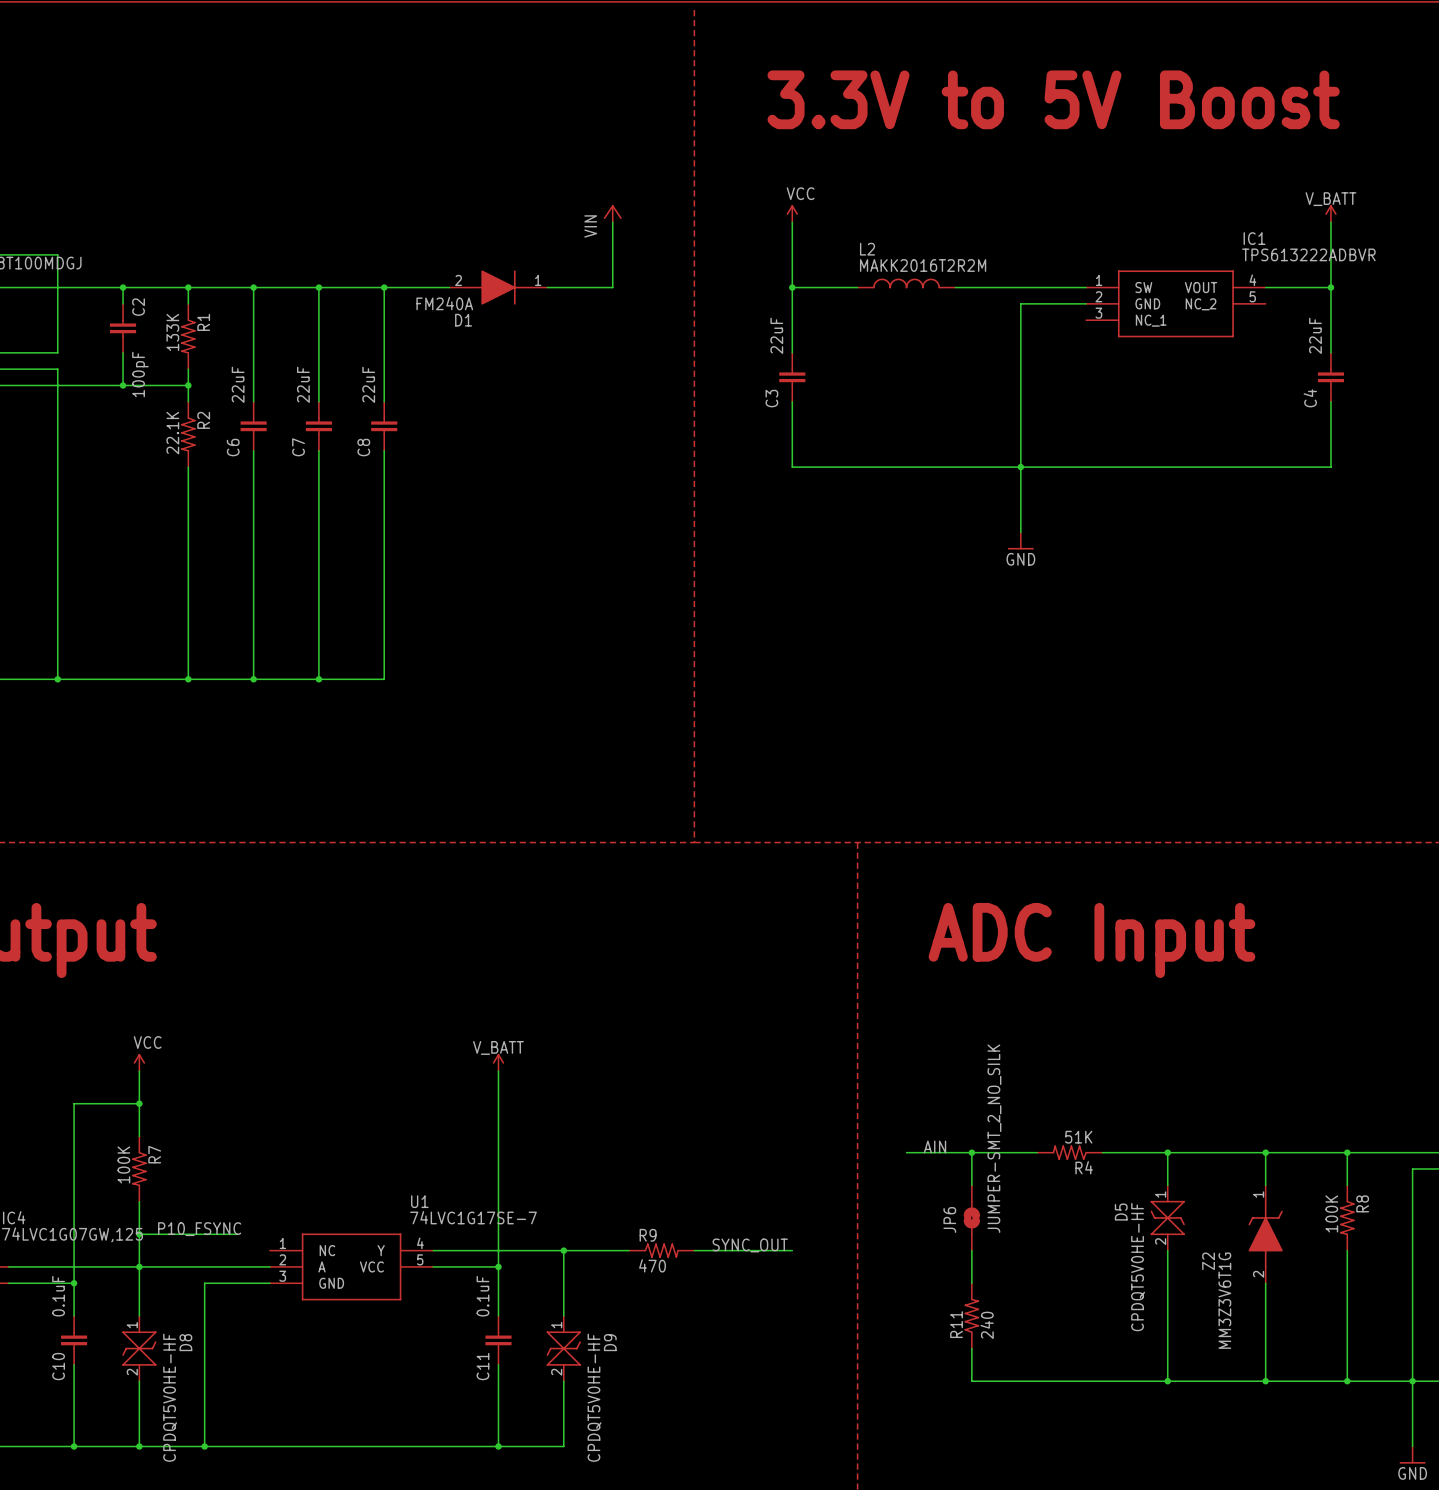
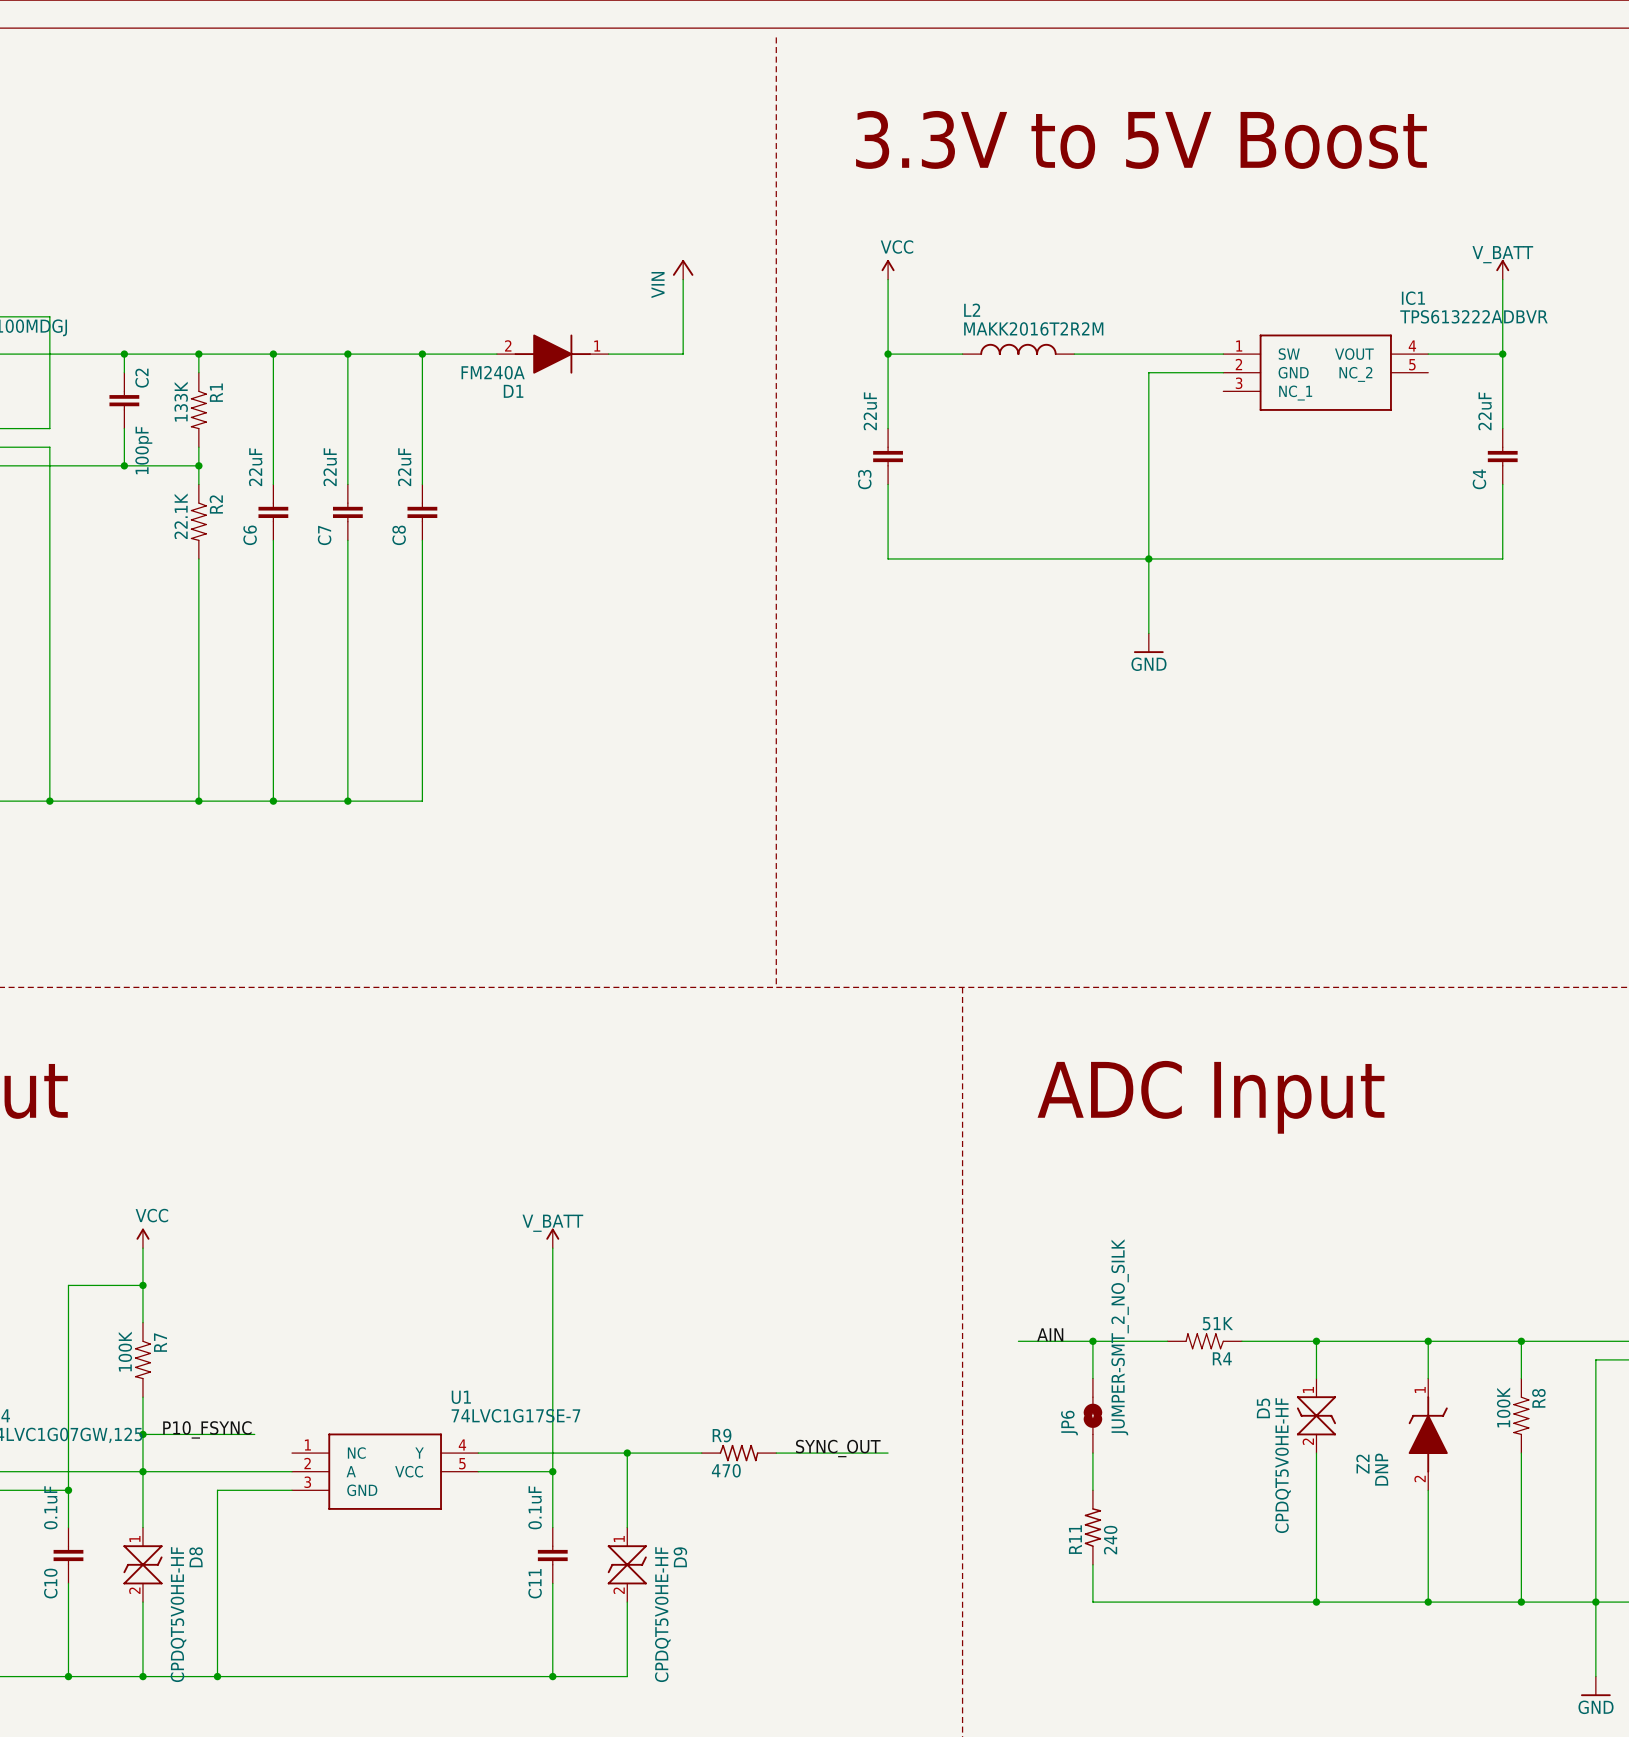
Z2 value: MM3Z3V6T1G (1224, 1300) -> DNP (1381, 1469)

